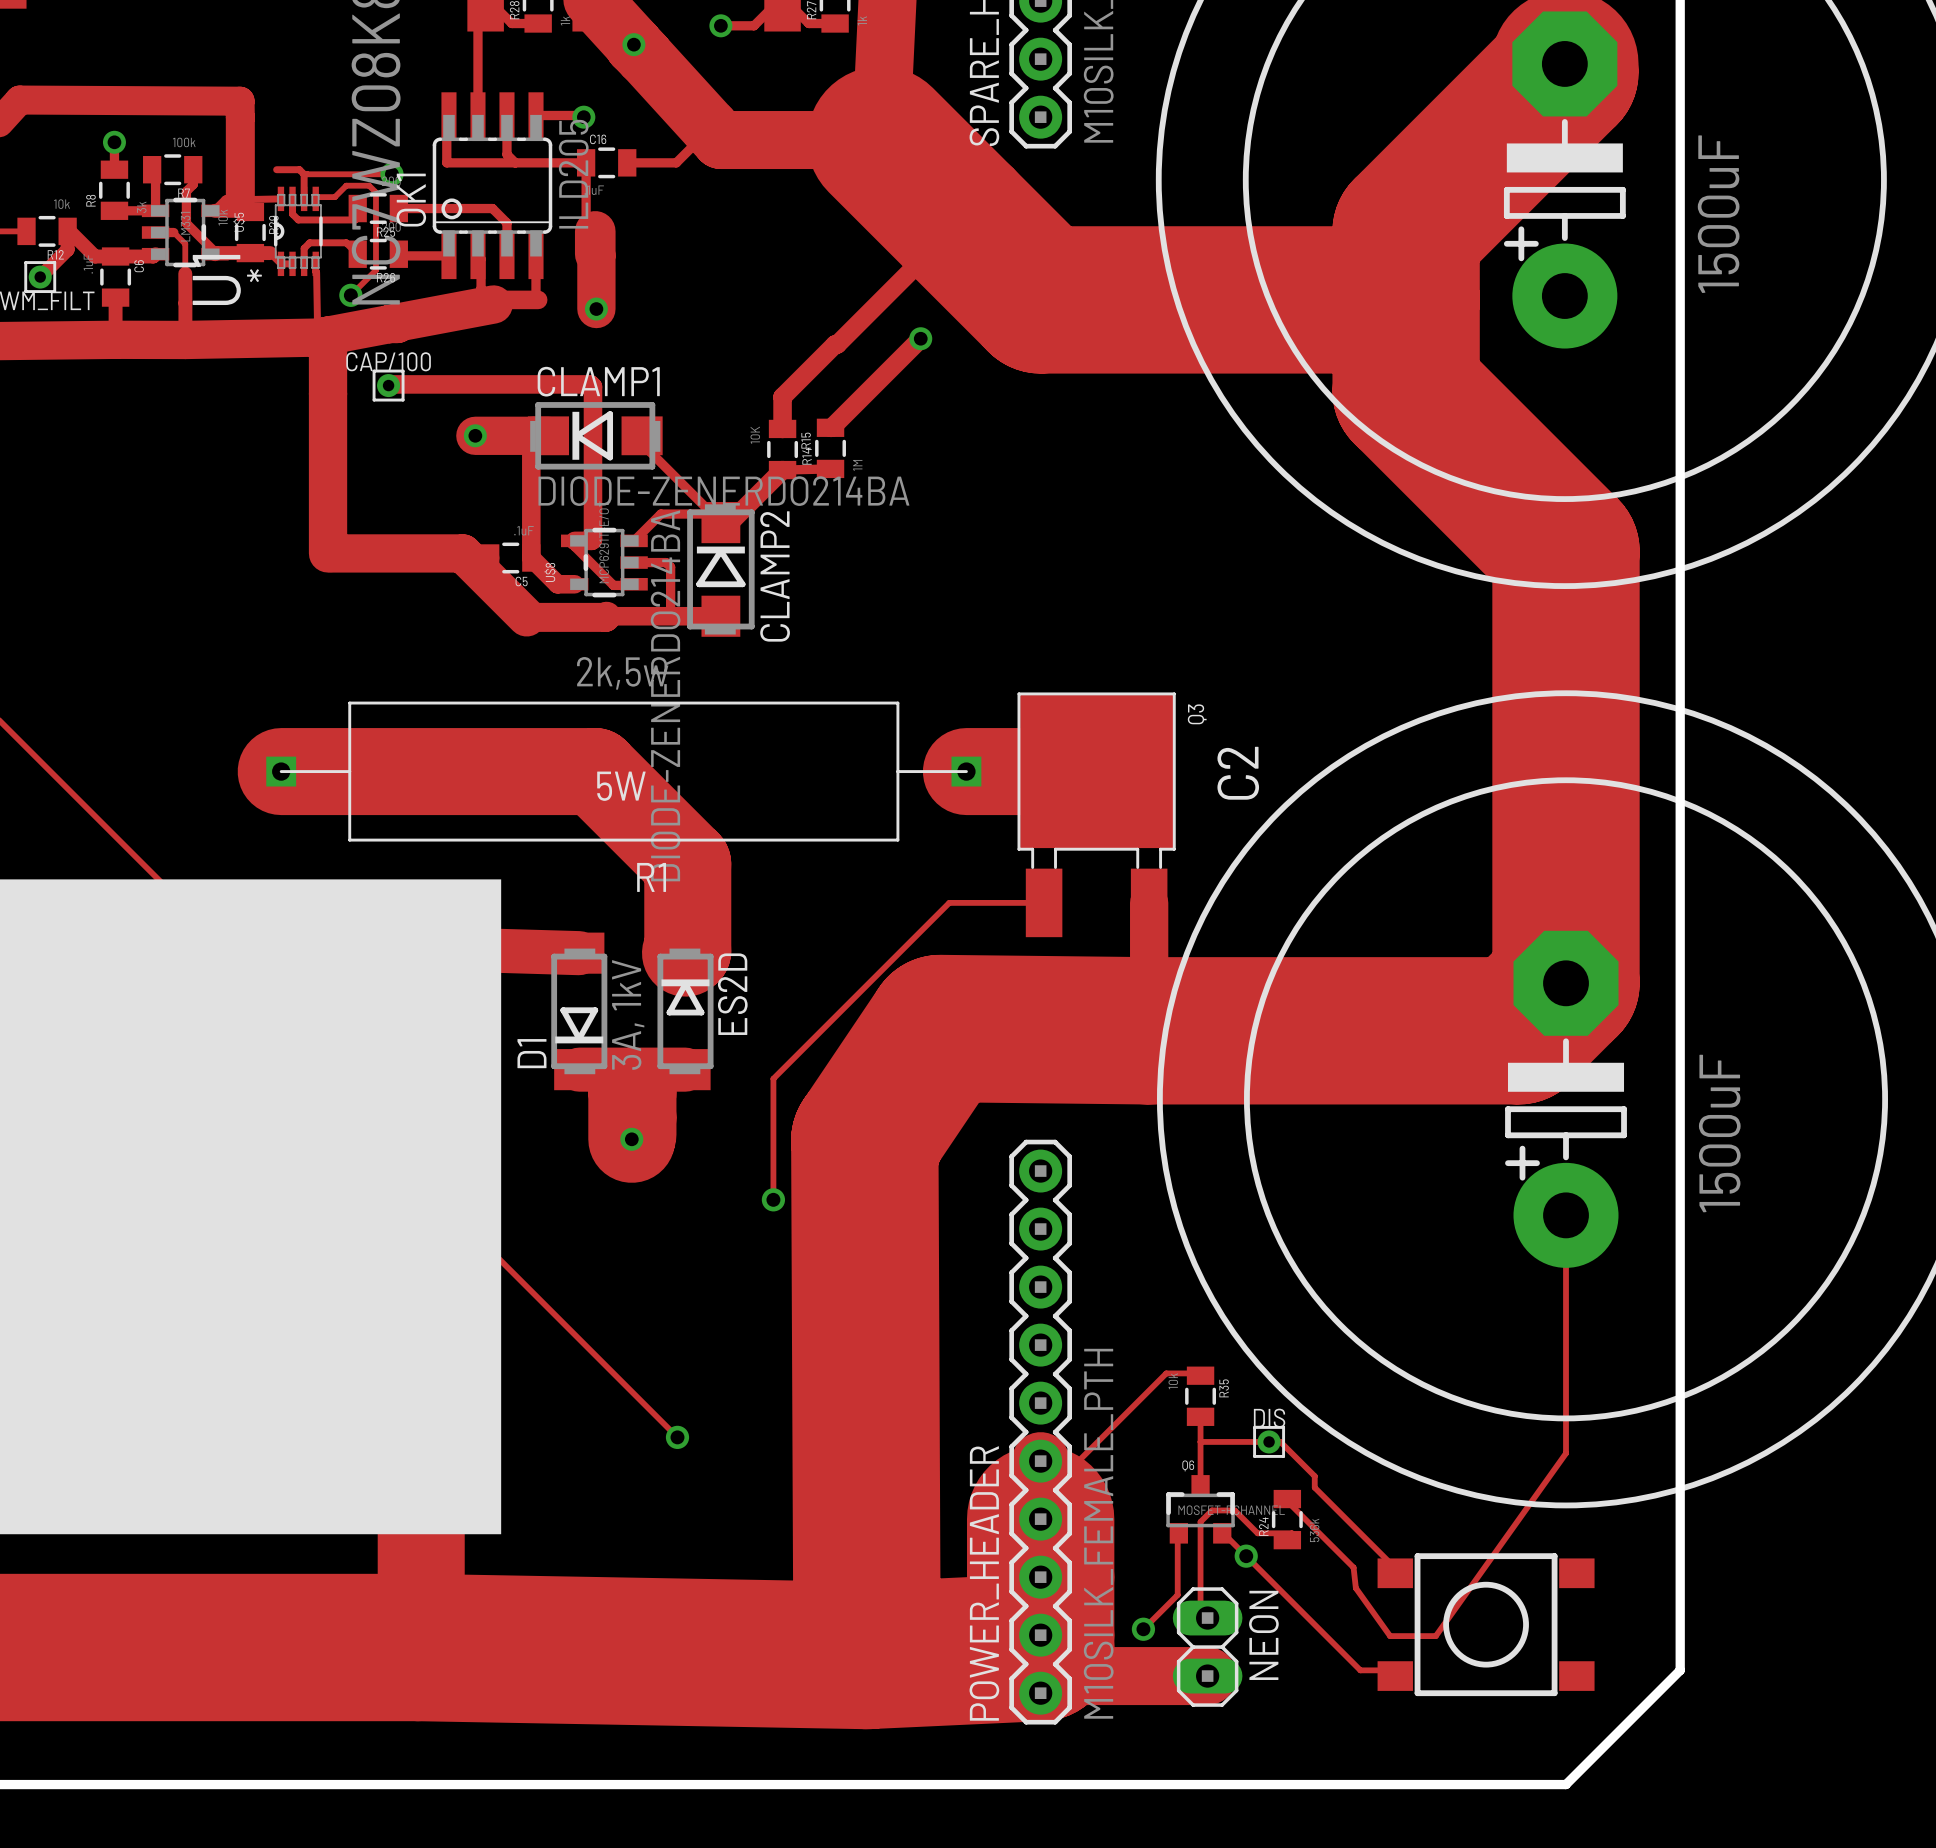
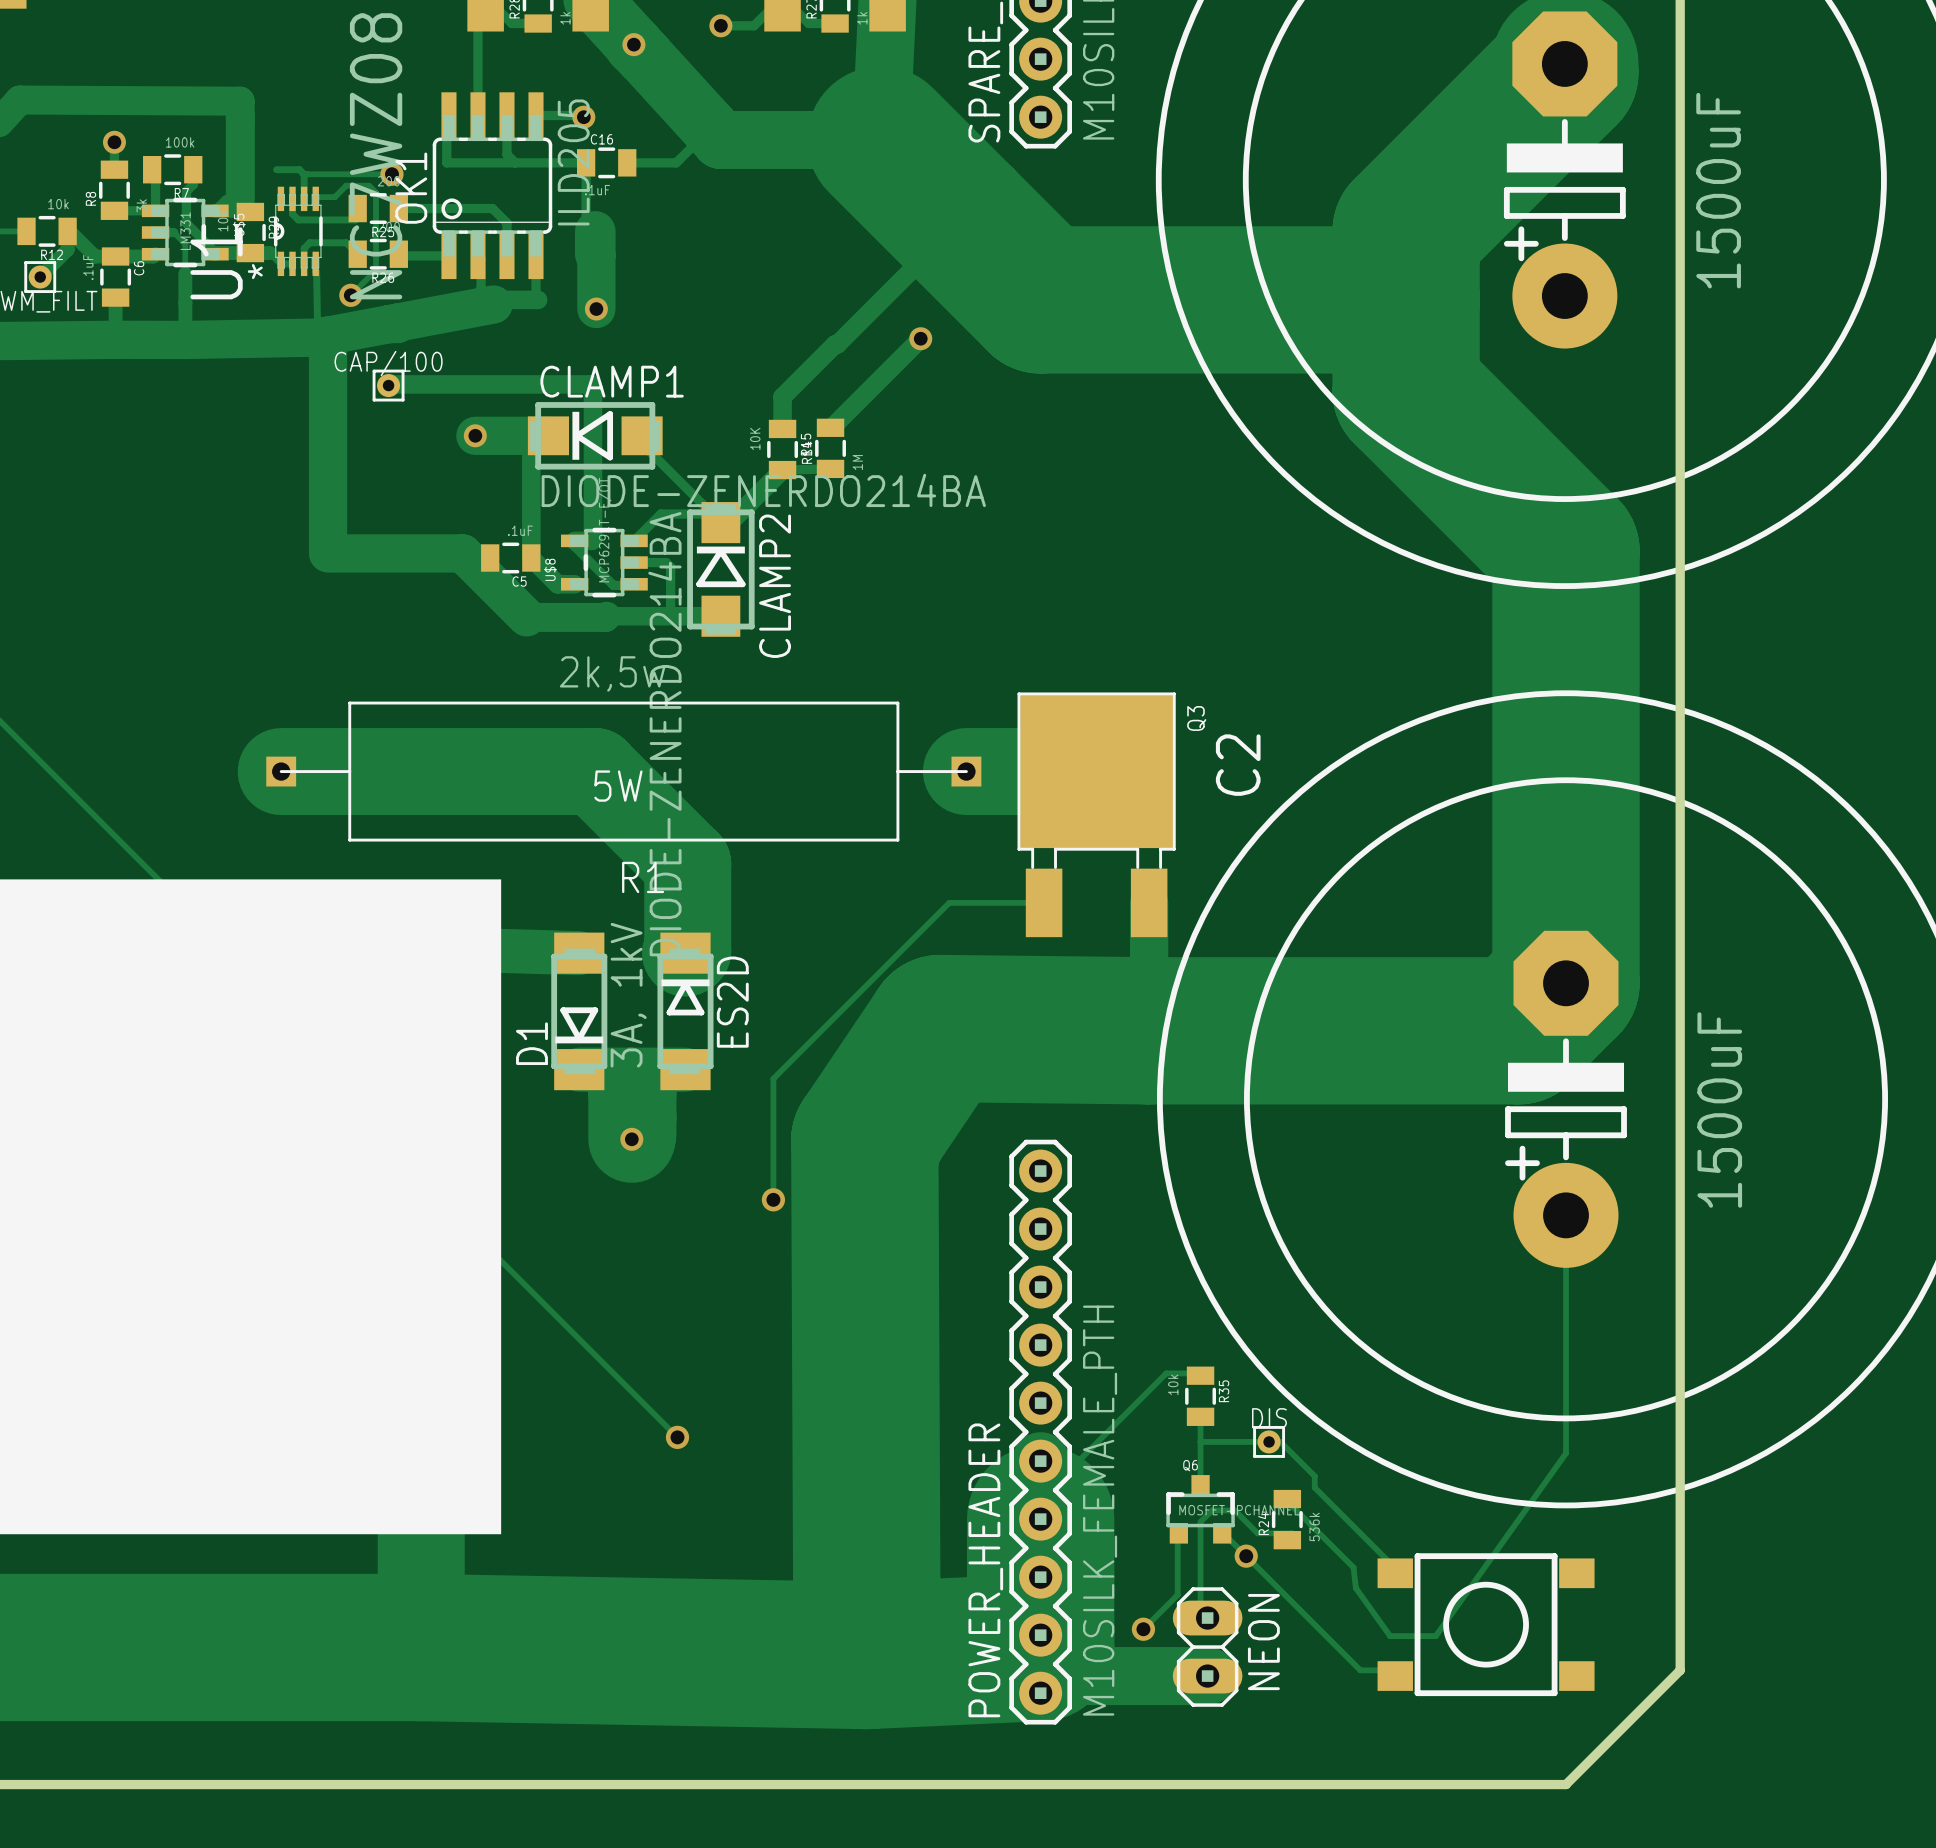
track: (280, 198) (240, 199) -> none

